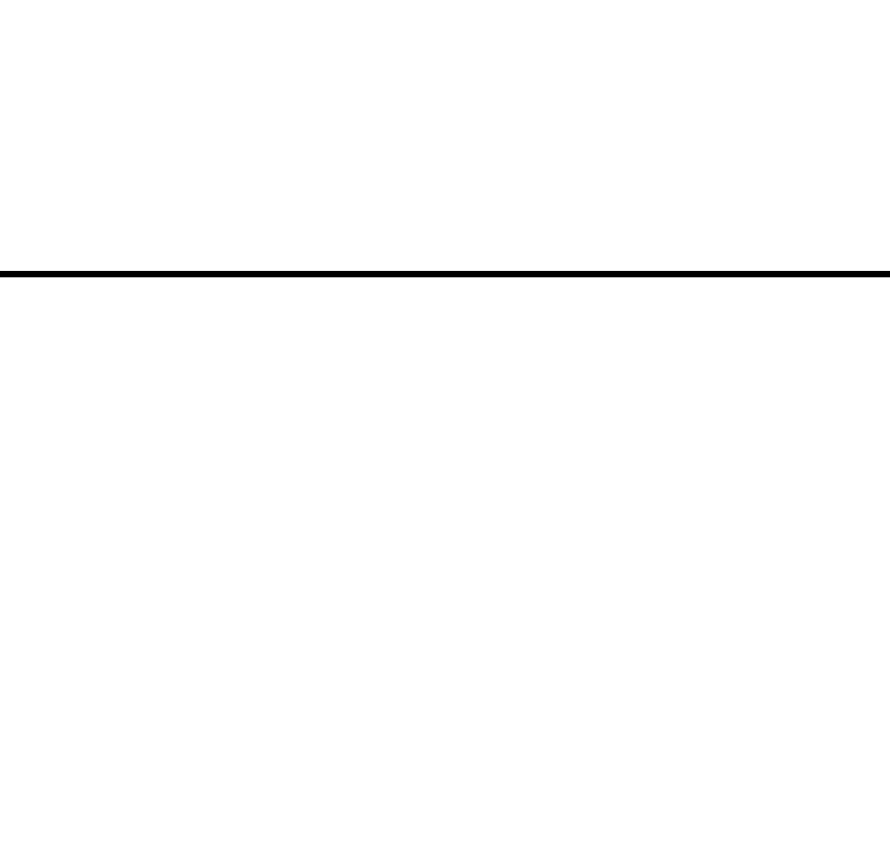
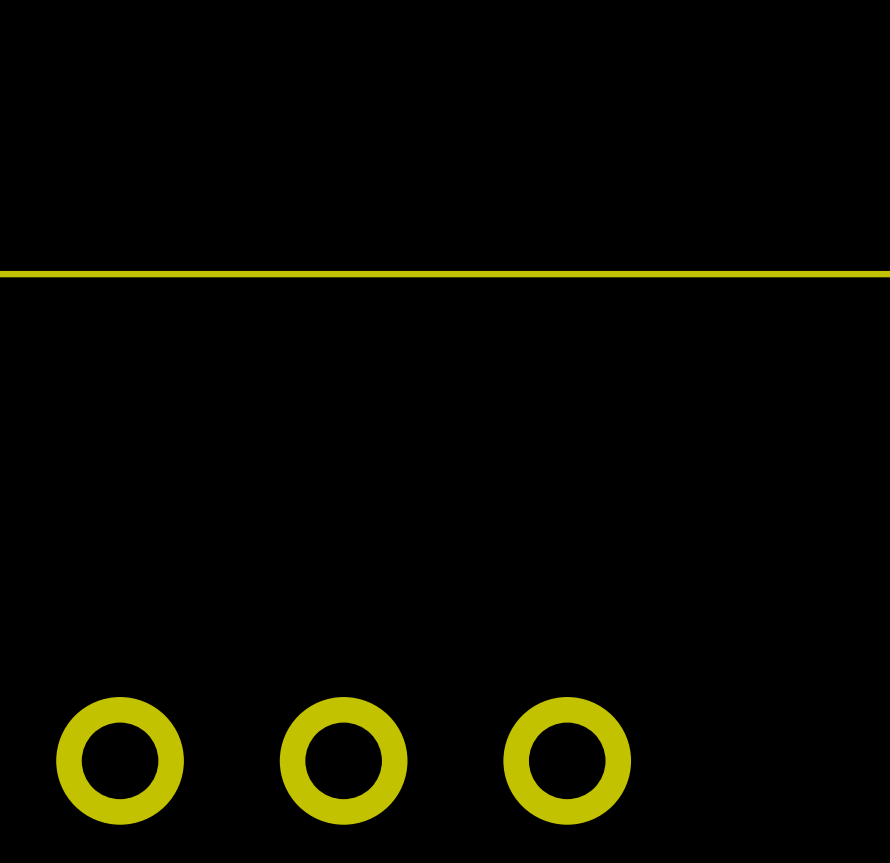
part: none -> (343, 760)

